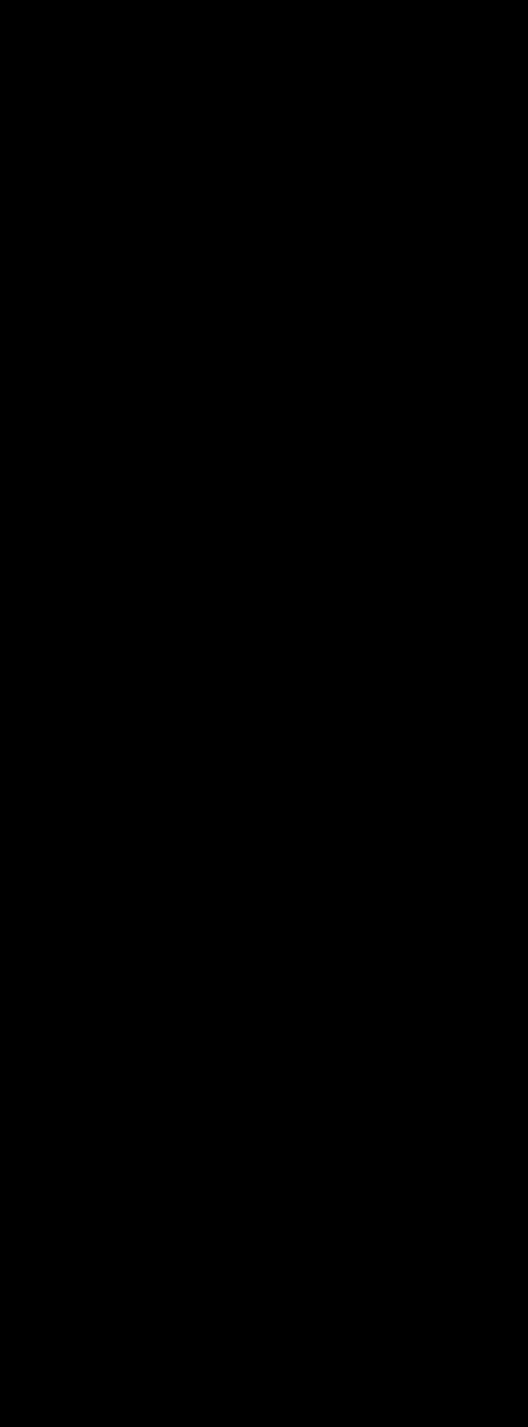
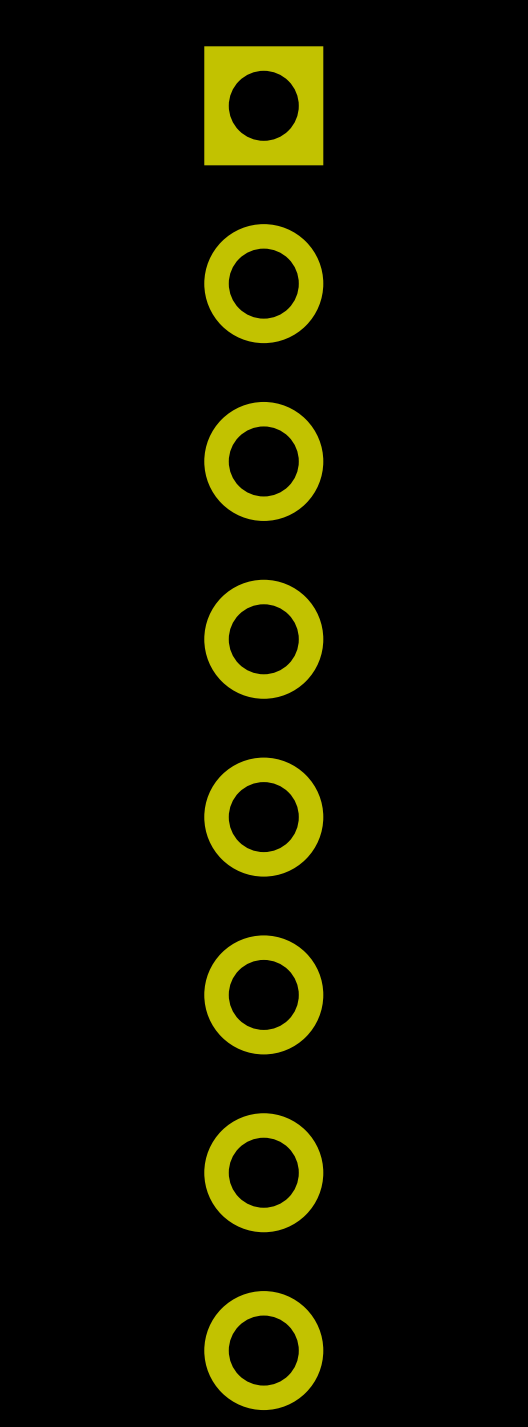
part: none -> (263, 728)

